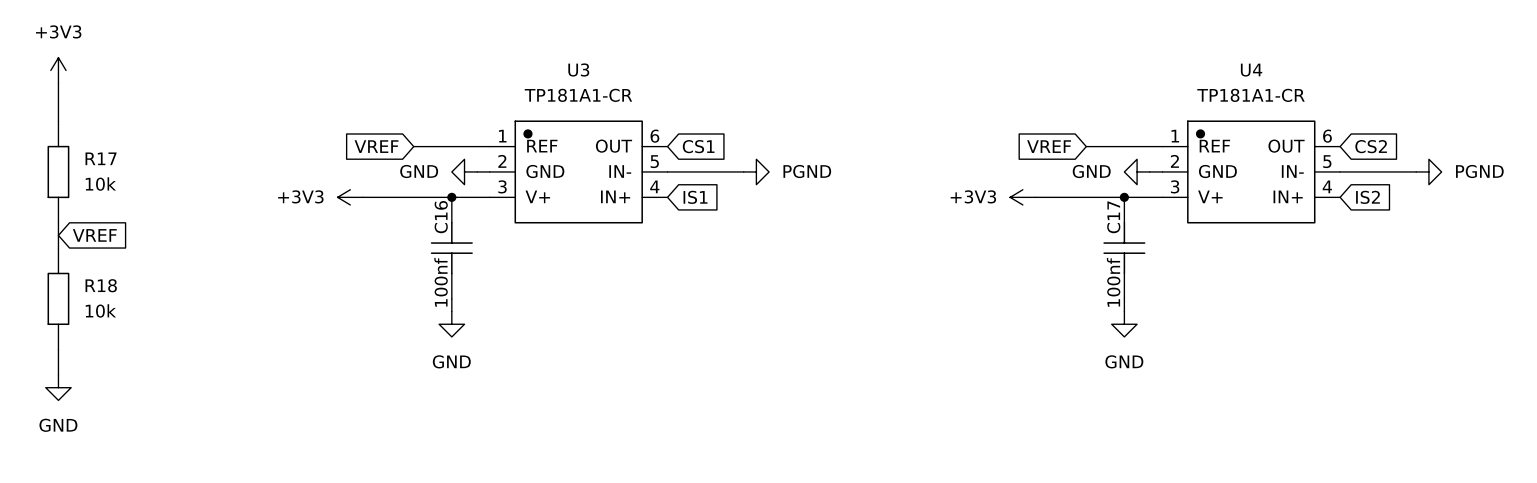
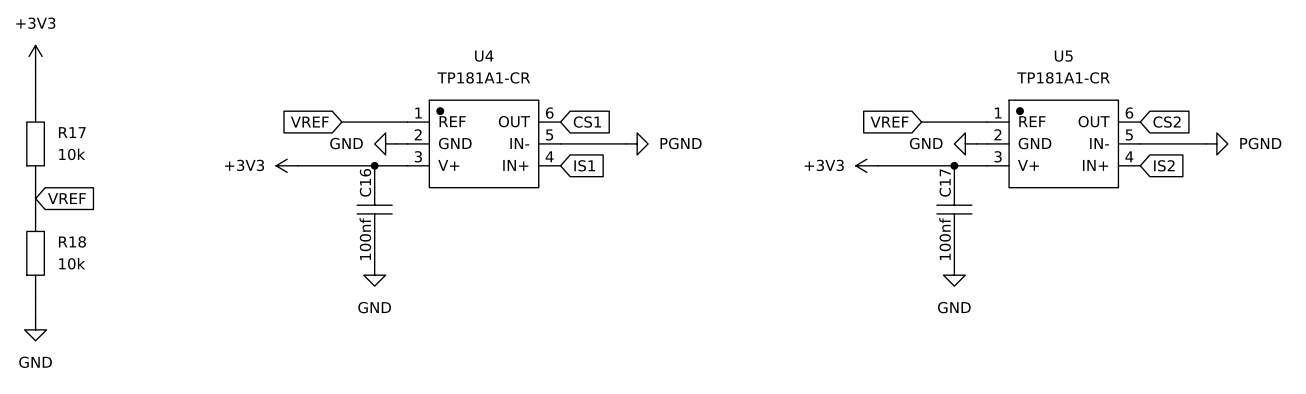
U3 name: U3 (578, 69) -> U4 (484, 56)
U4 name: U4 (1251, 70) -> U5 (1063, 56)

